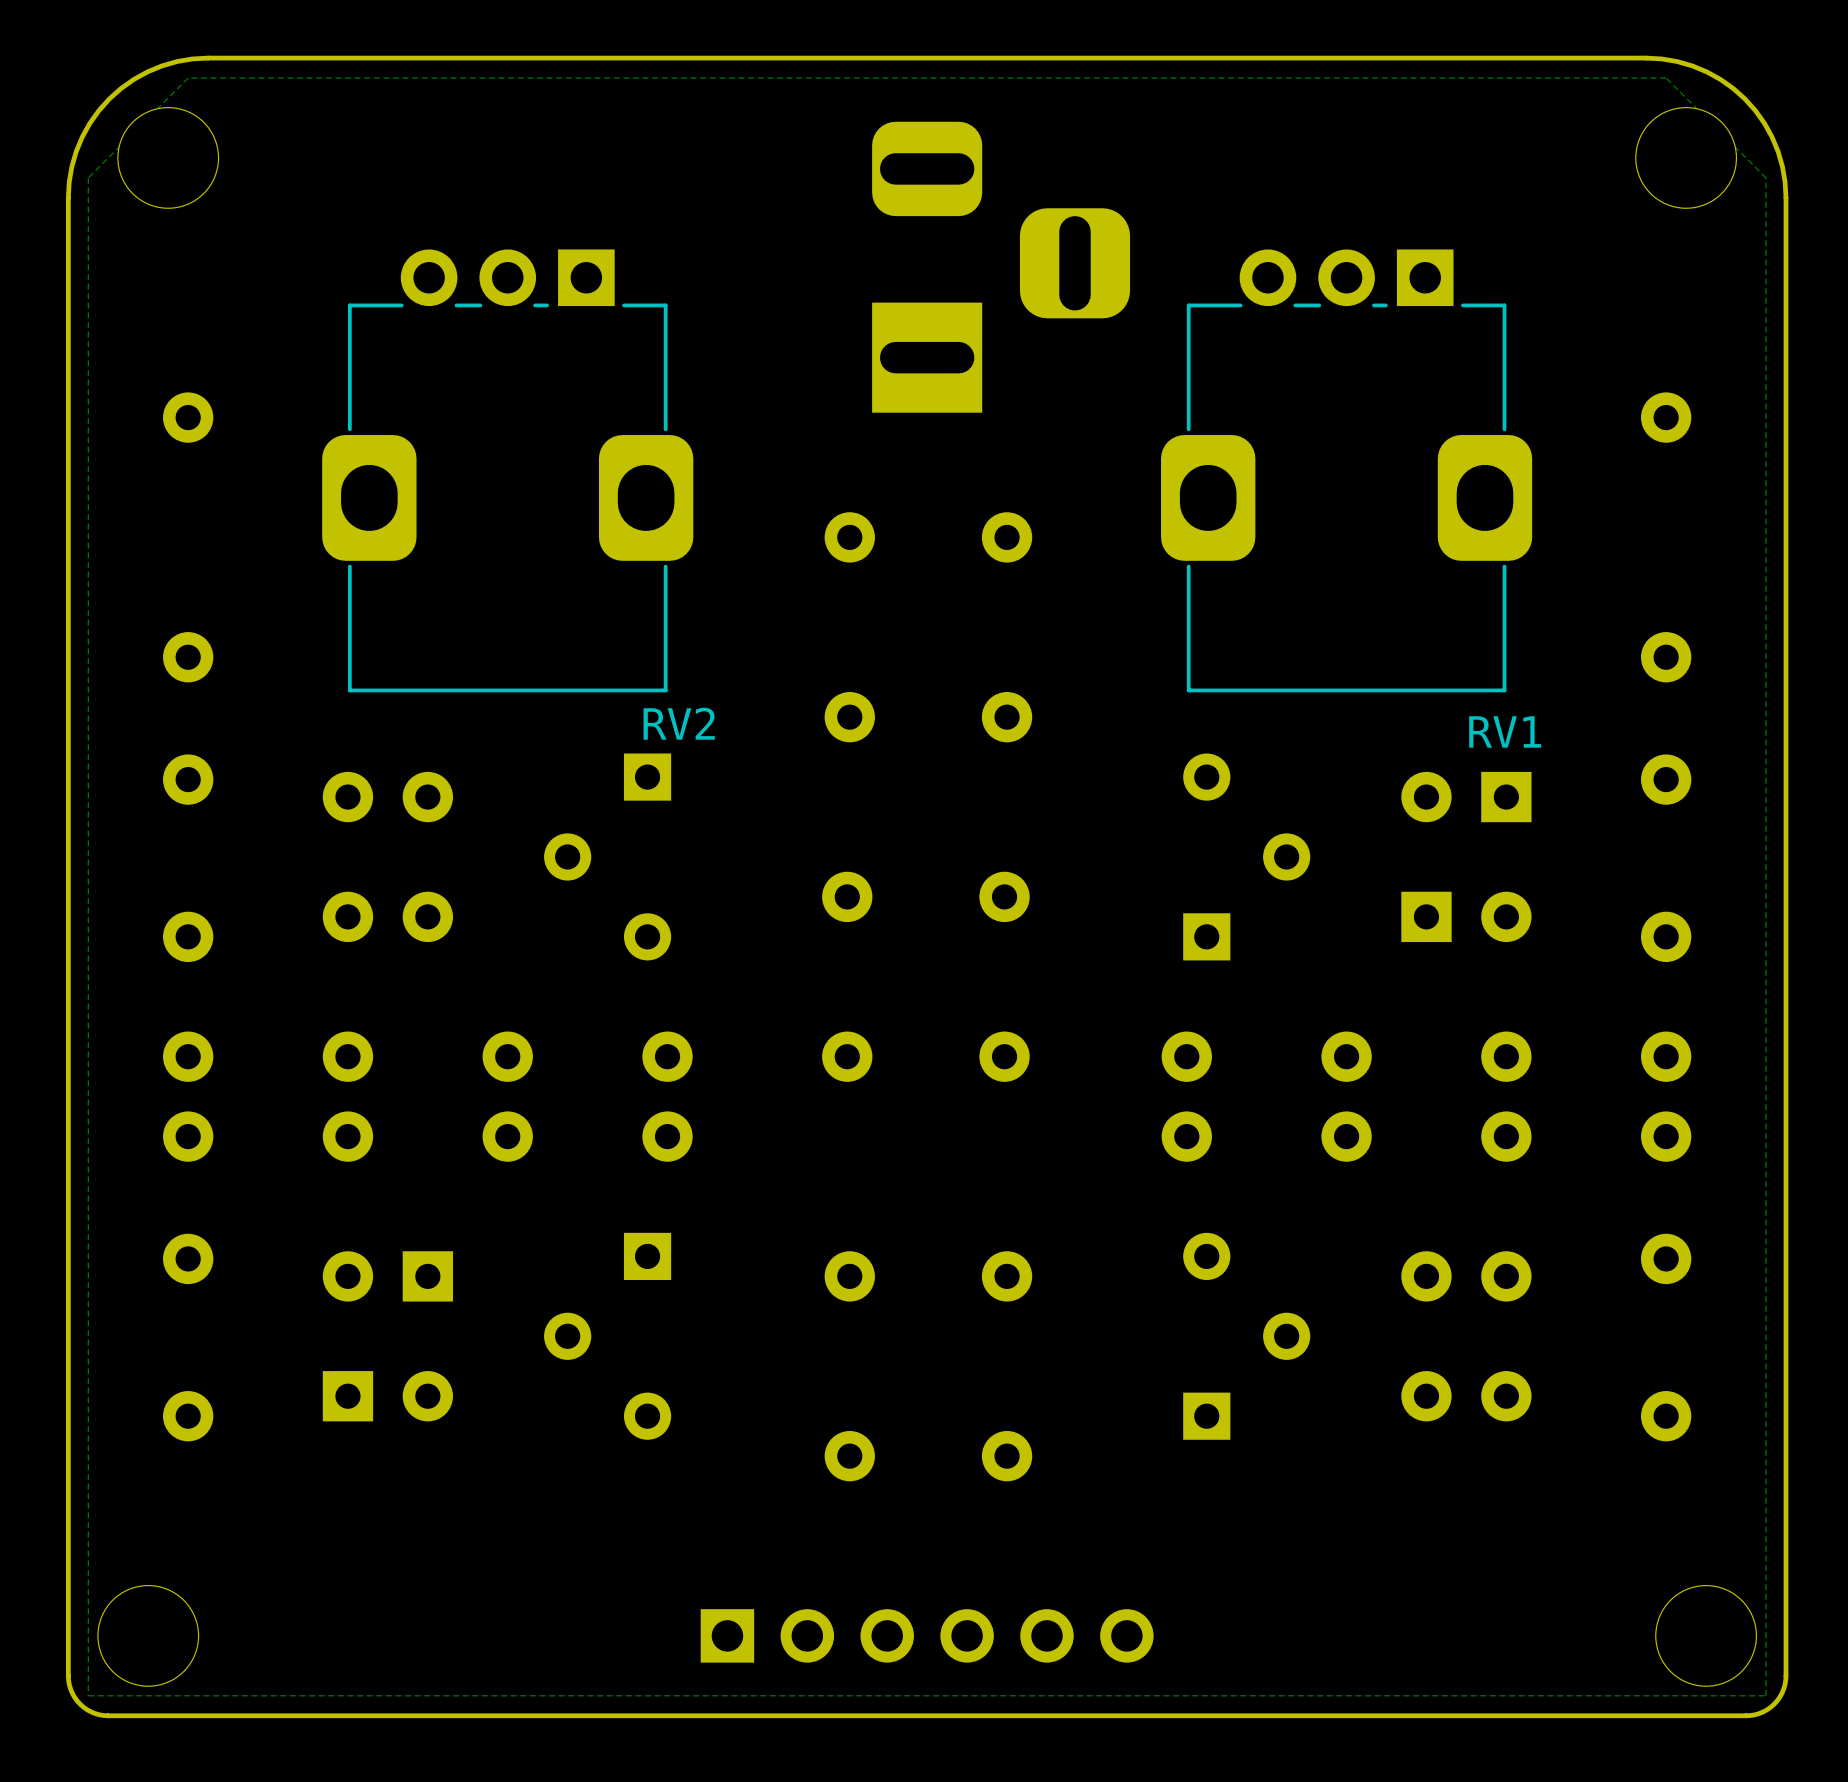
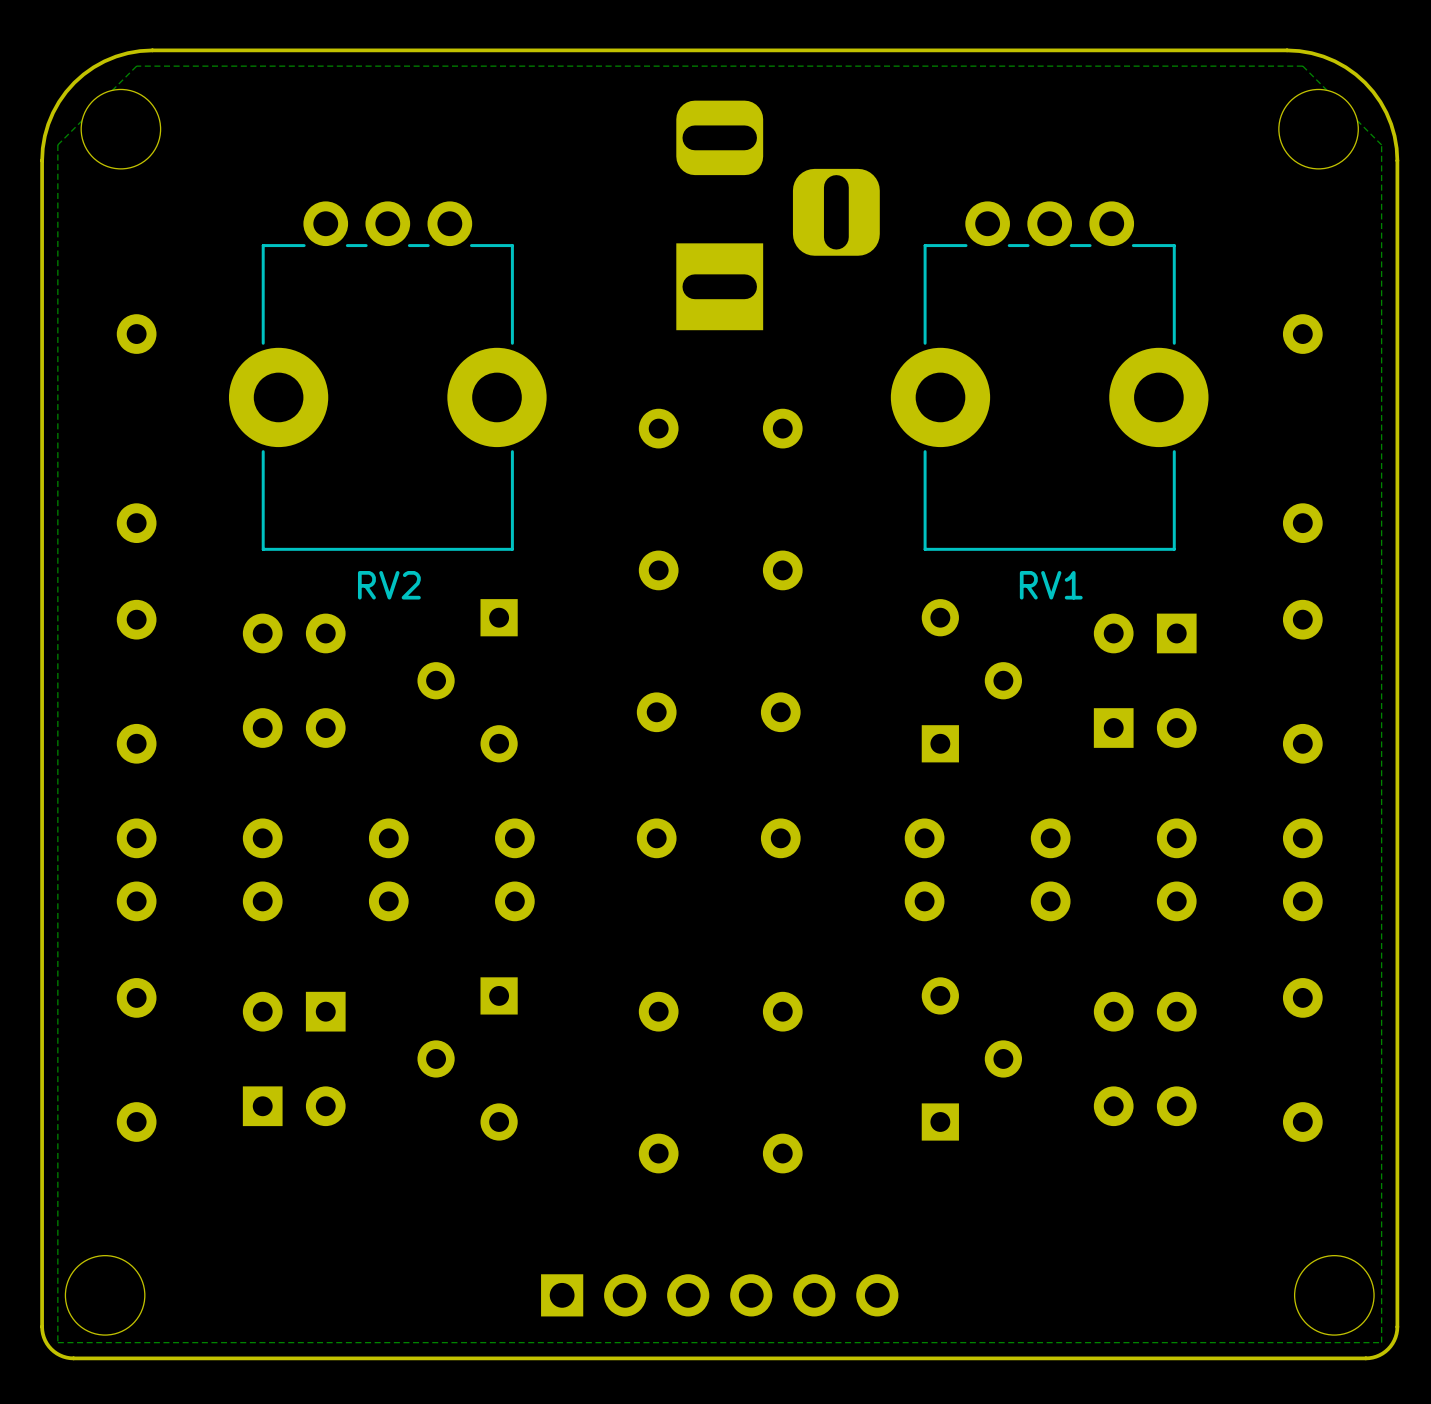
RV2 footprint: [322, 249, 694, 693] -> [228, 201, 547, 551]
RV1 footprint: [1161, 249, 1533, 693] -> [890, 201, 1209, 551]
RV2 name position: RV2 (679, 723) -> RV2 (389, 585)
RV1 name position: RV1 (1505, 731) -> RV1 (1051, 585)

